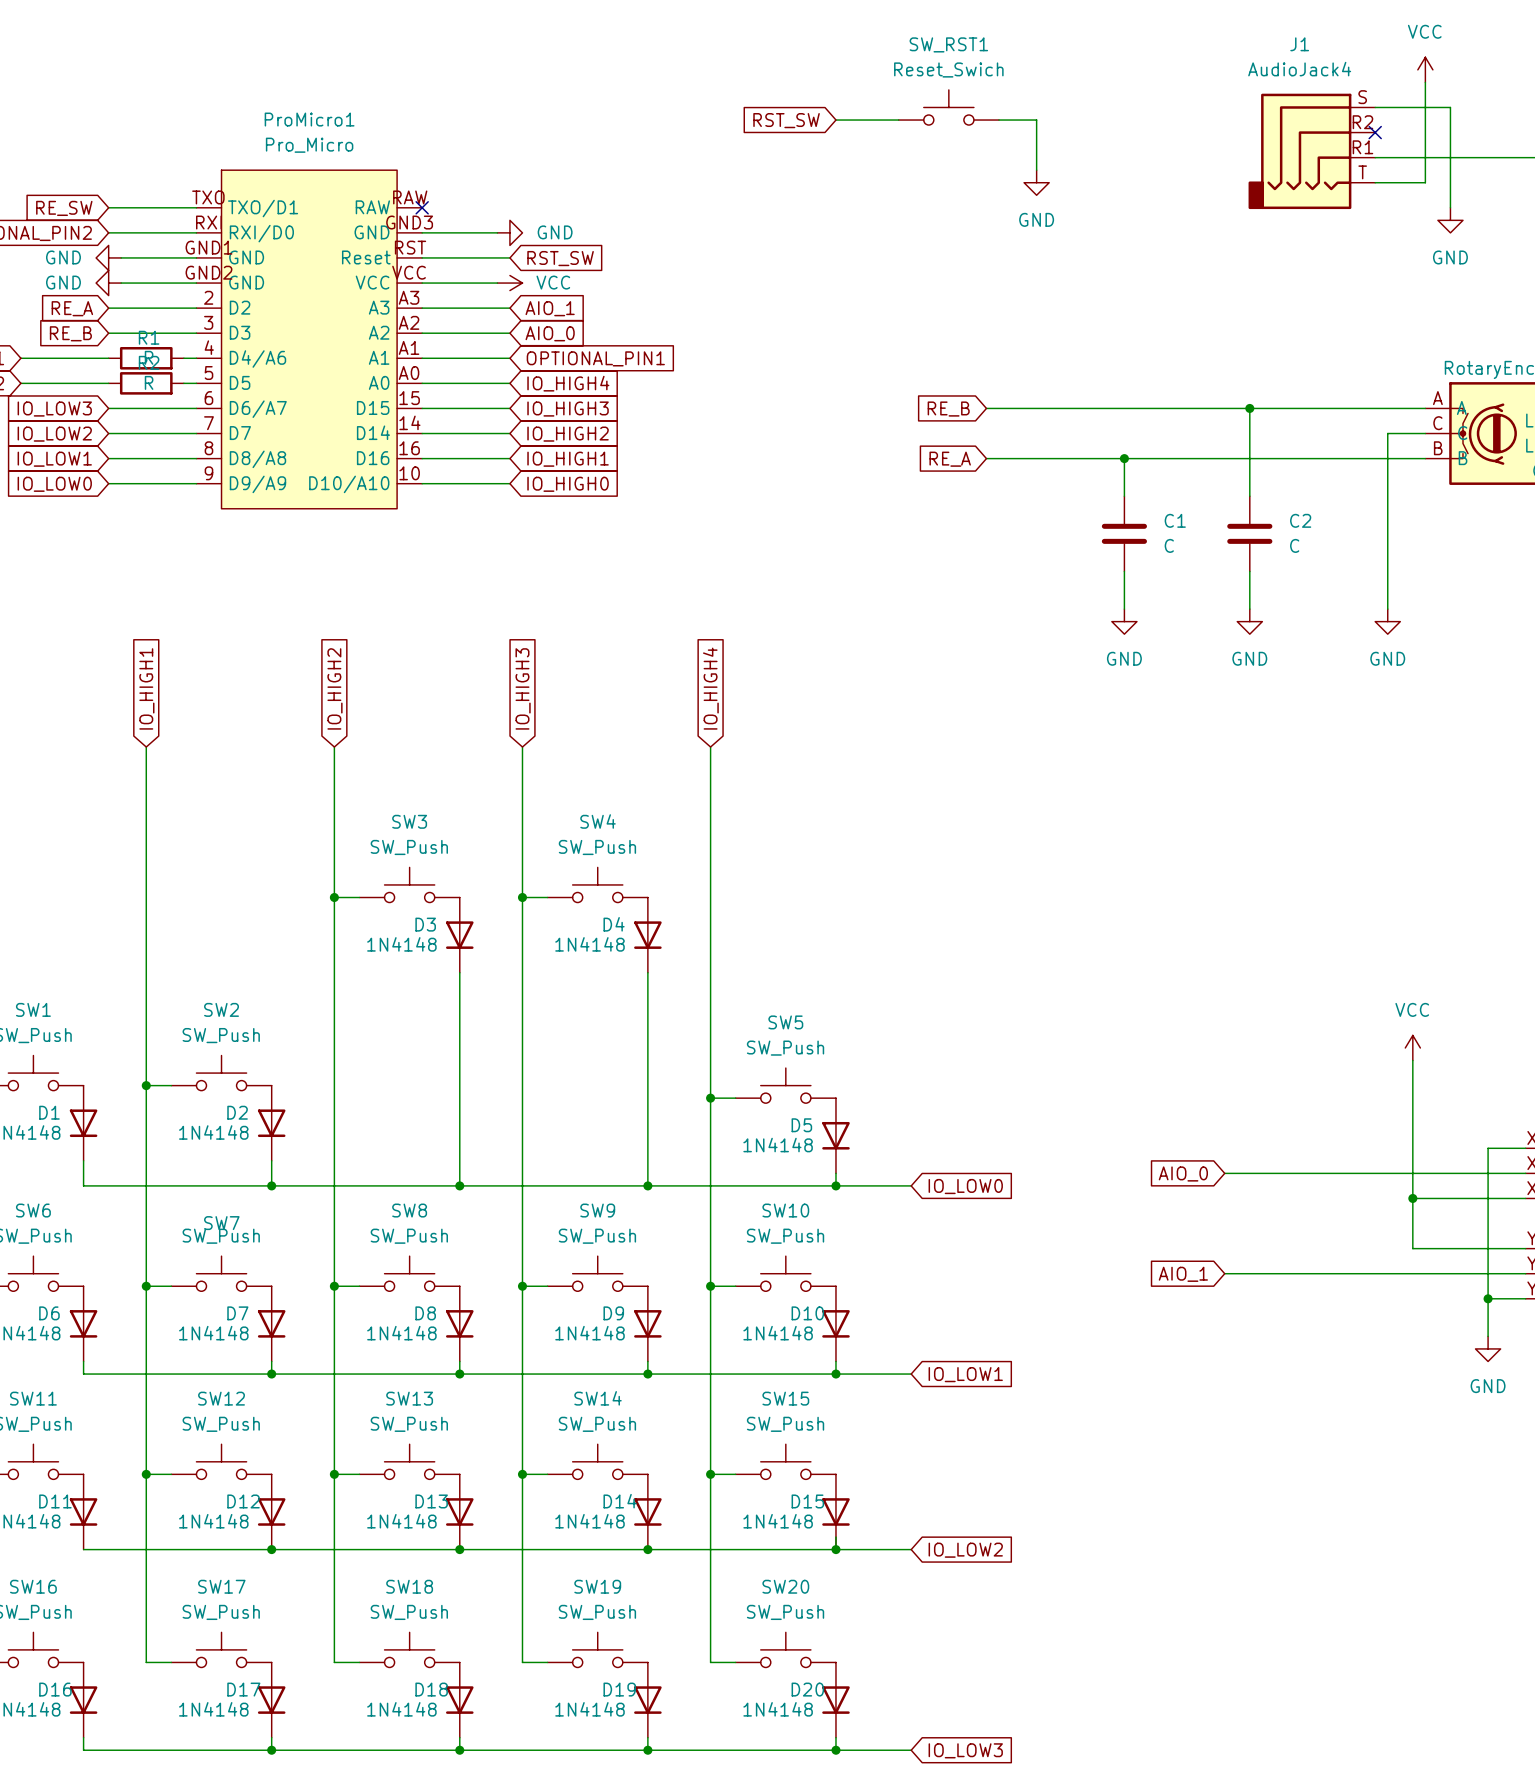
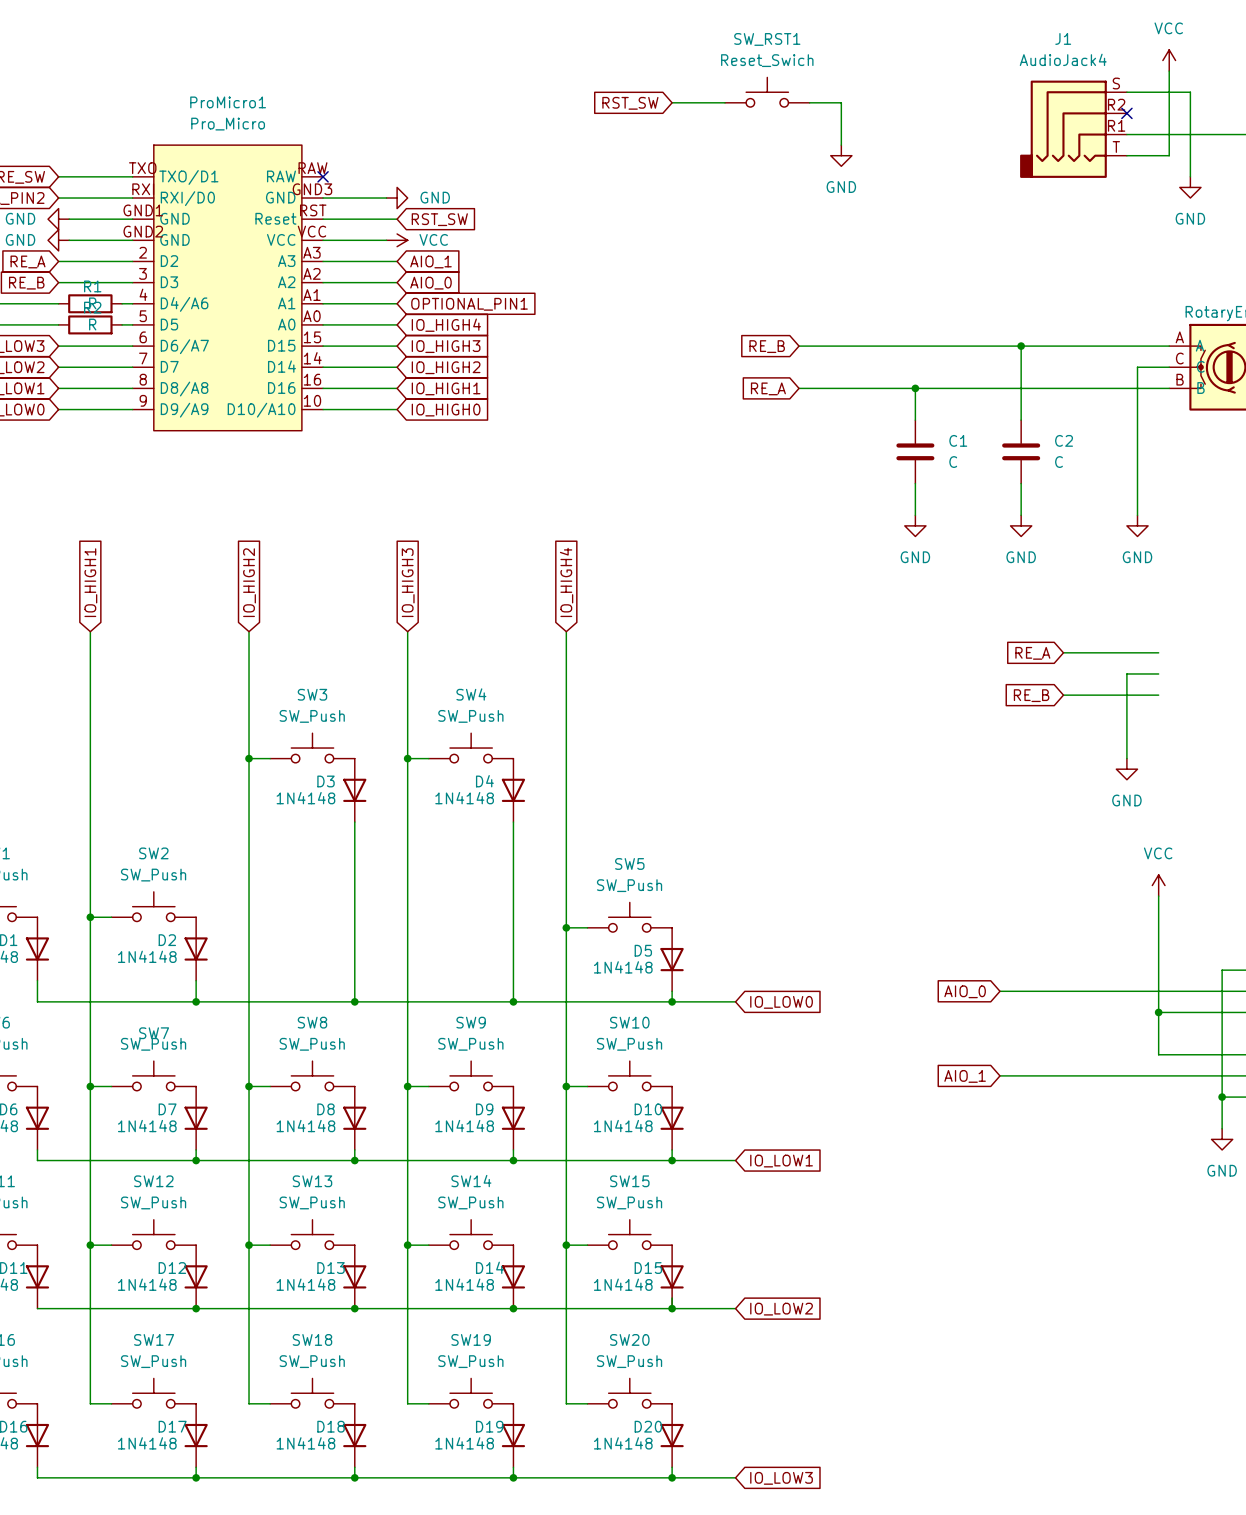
global label: none -> RE_A (1032, 653)
wire: none -> (1063, 652) (1158, 652)
wire: none -> (1158, 673) (1126, 673) (1126, 758)
global label: none -> RE_B (1031, 695)
wire: none -> (1063, 695) (1158, 695)
power symbol: none -> GND (1126, 769)

